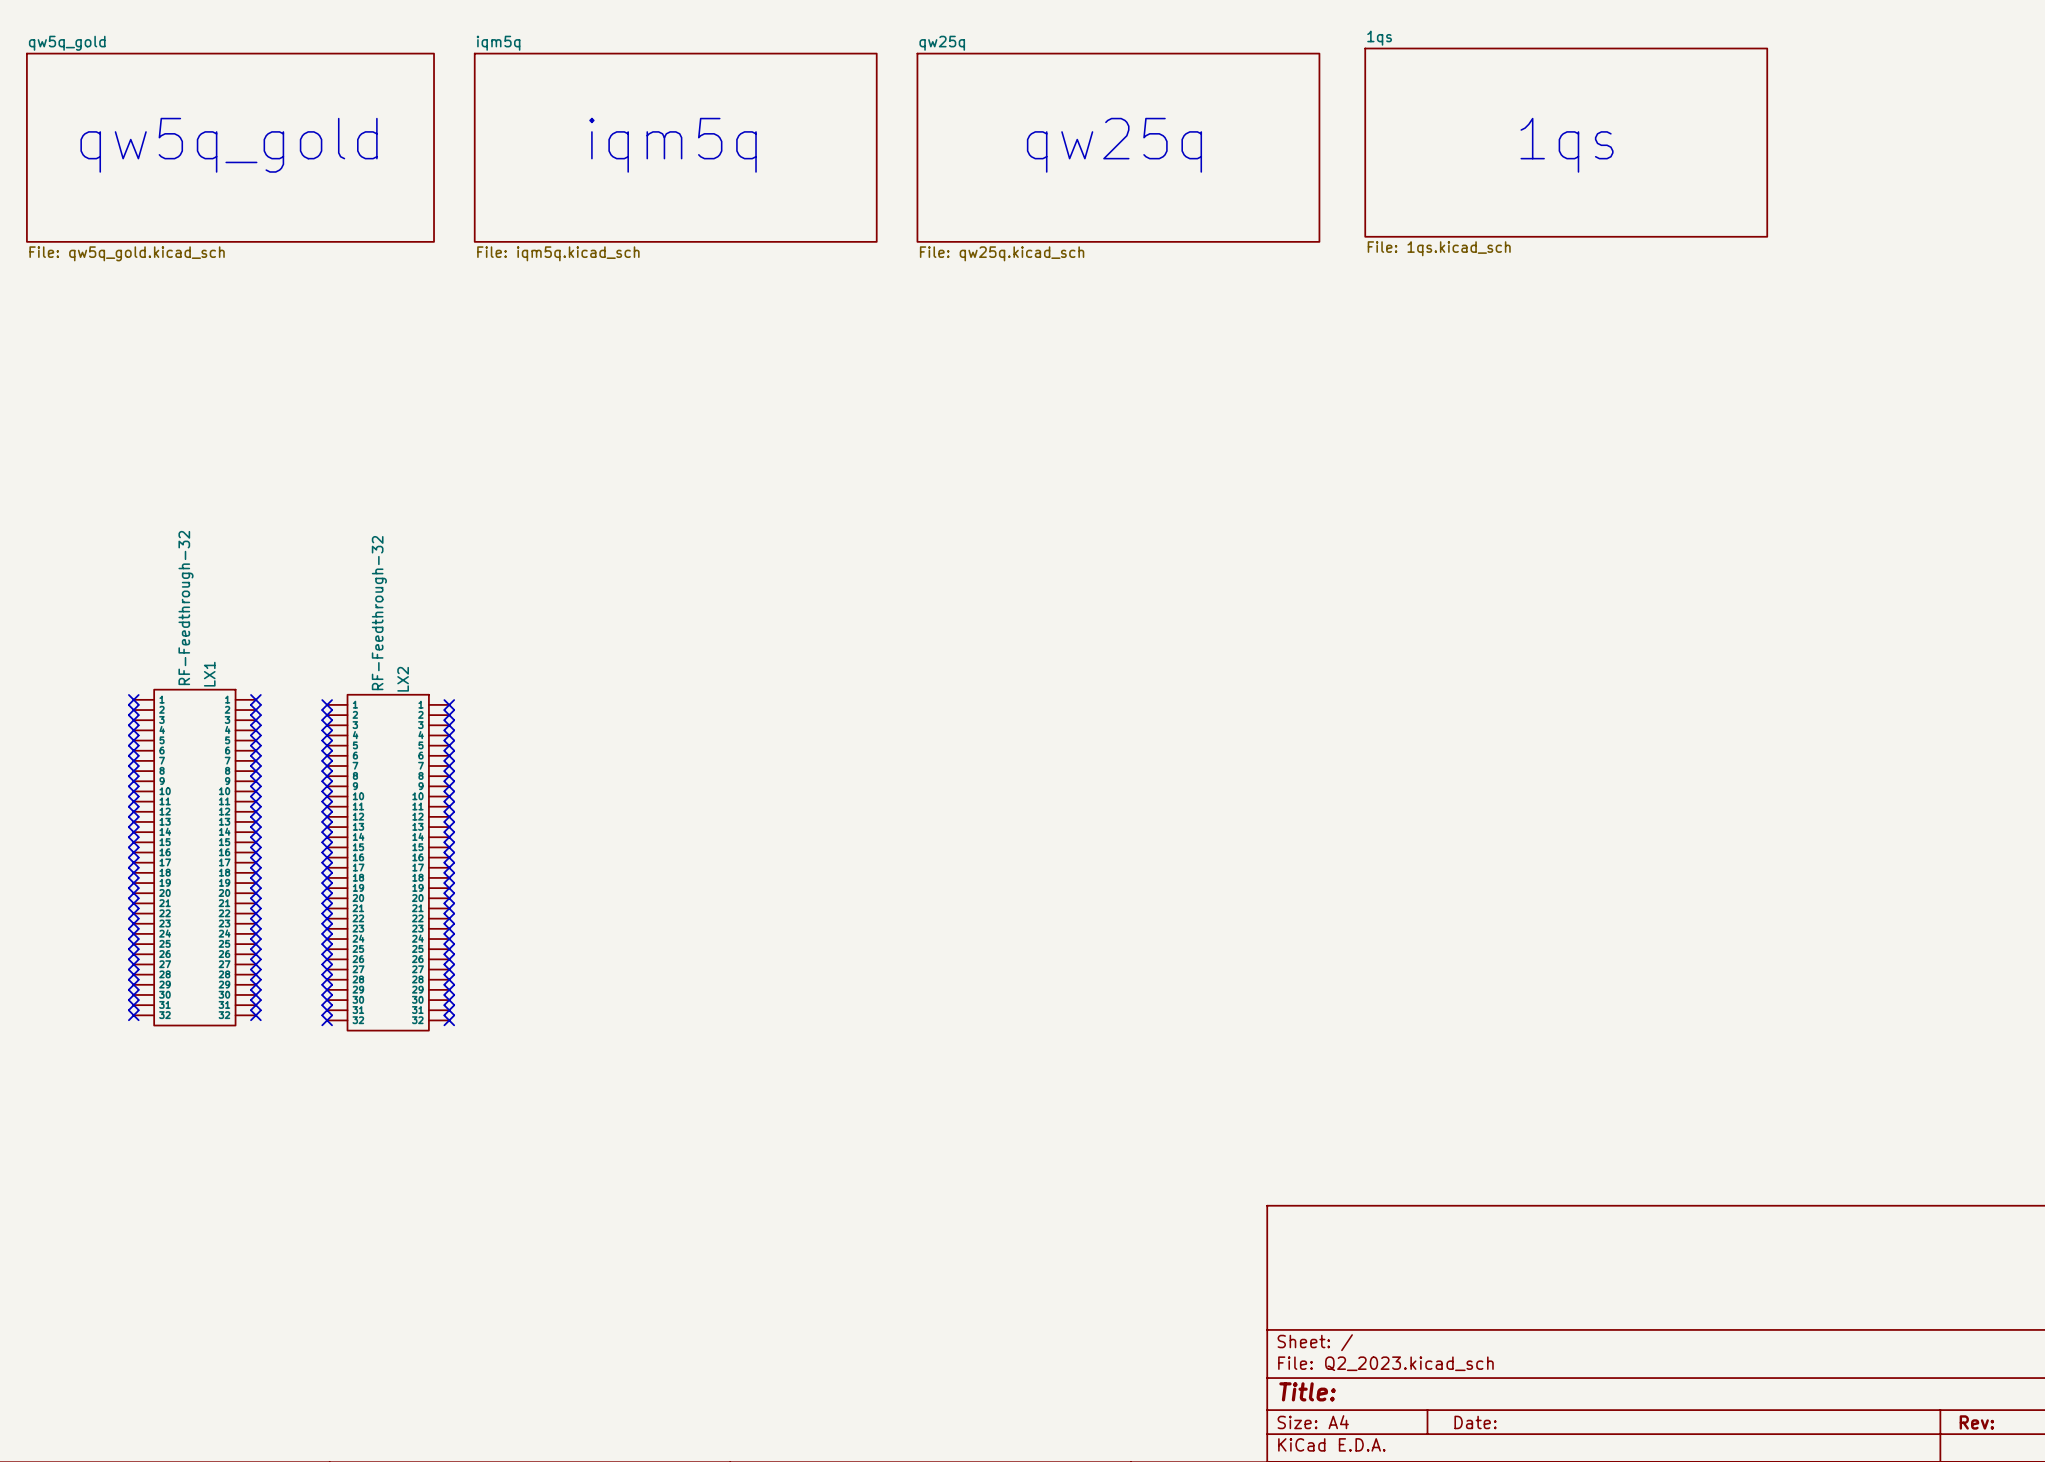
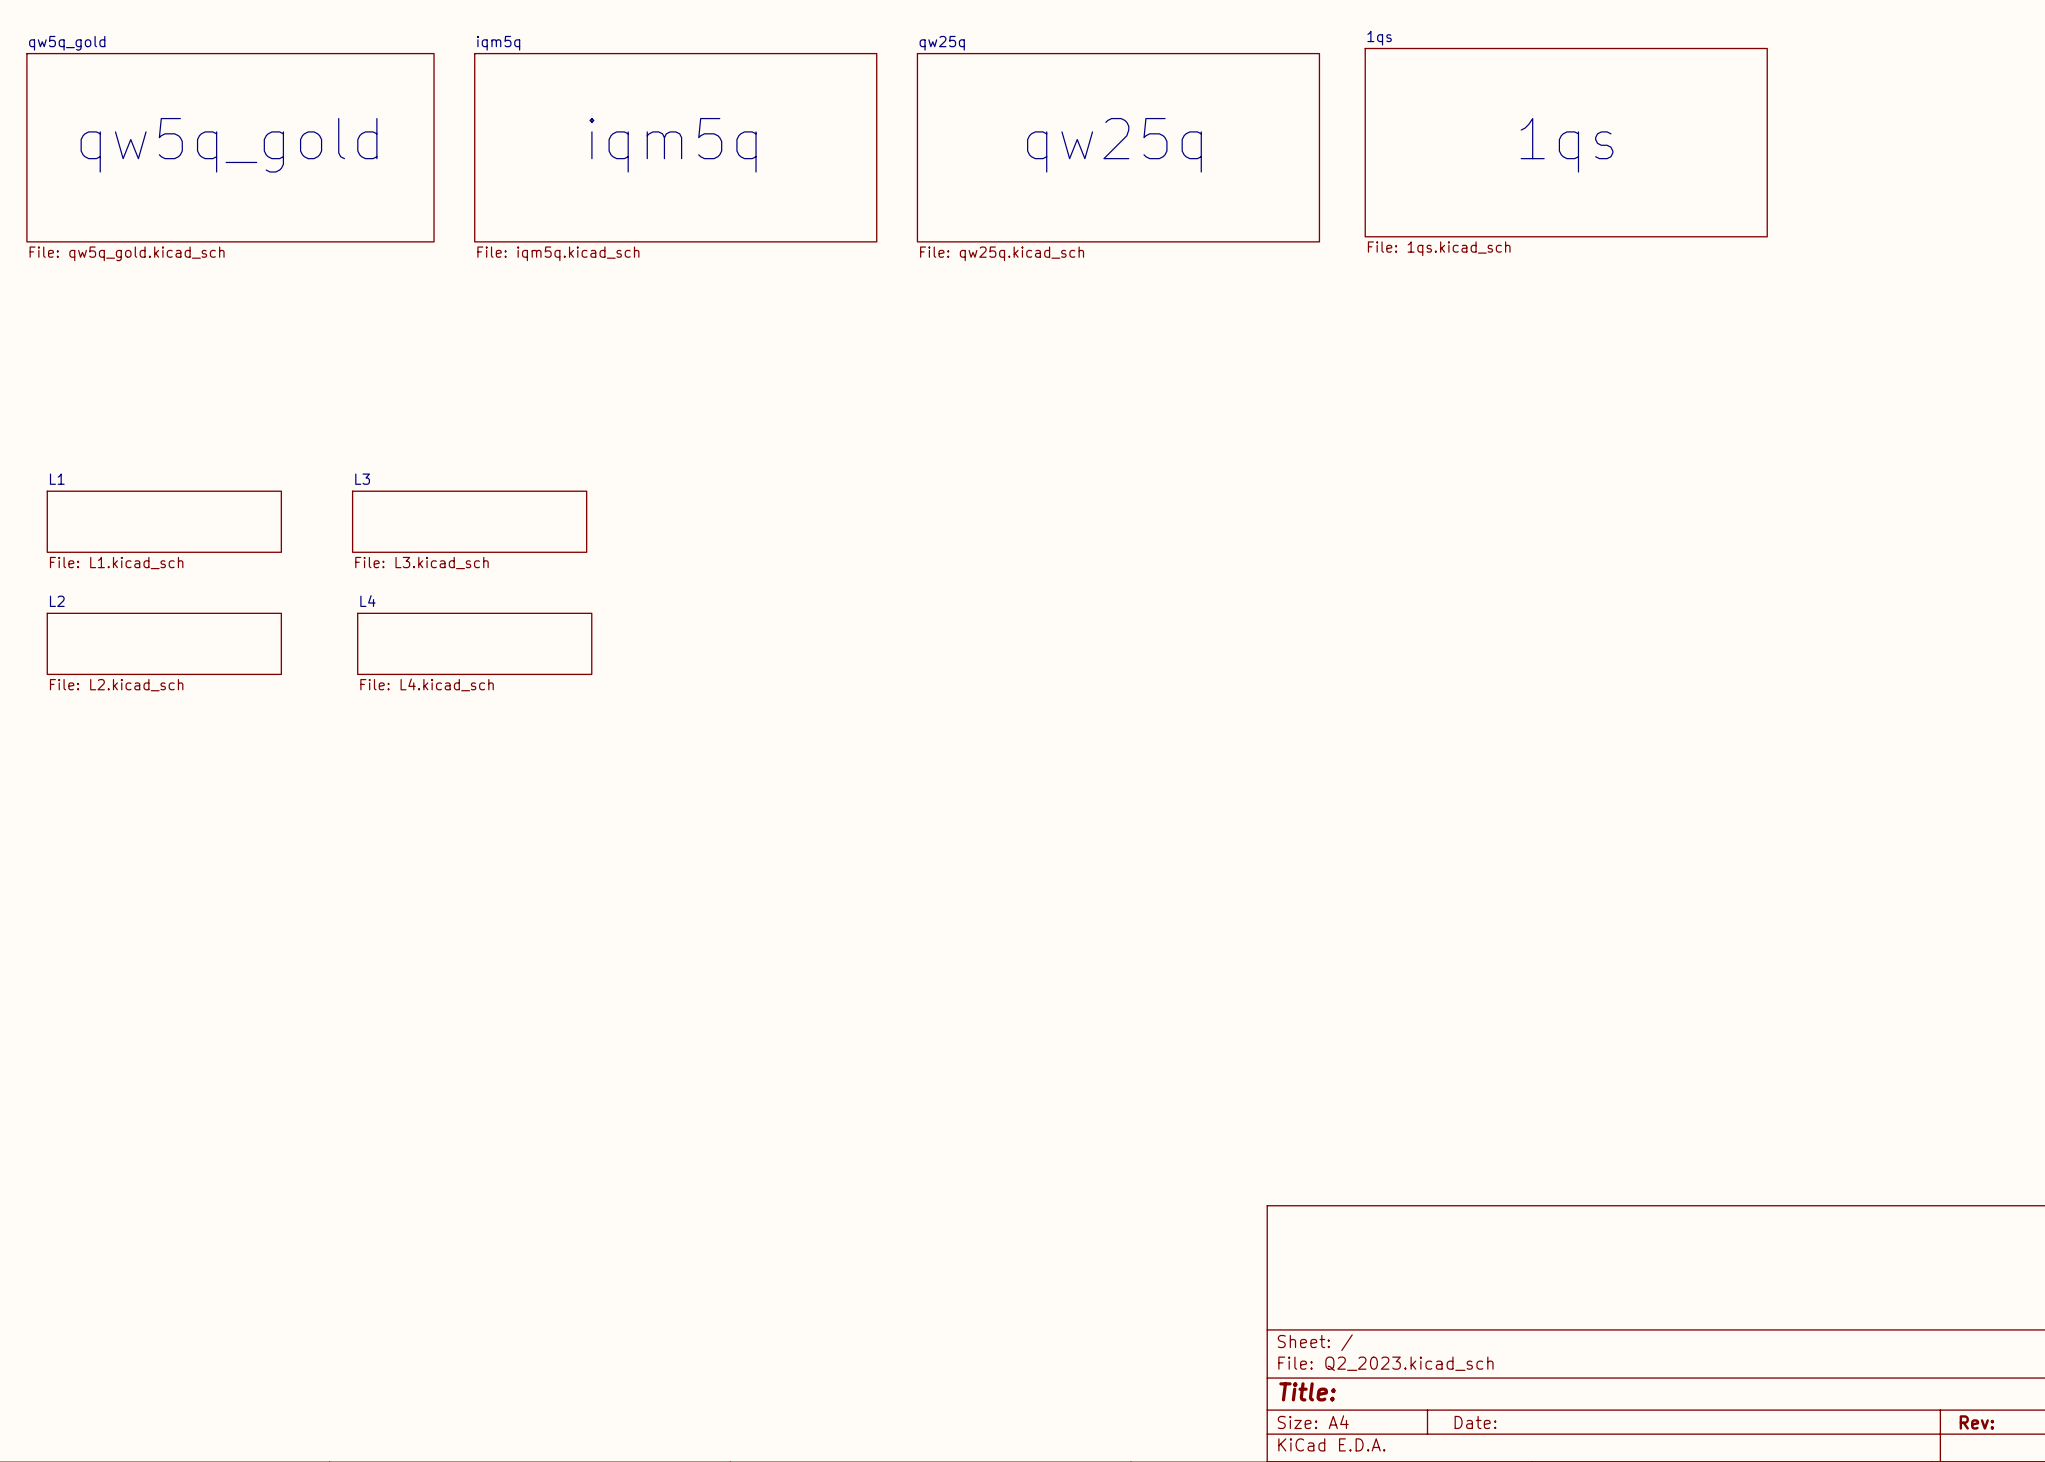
sheet L1: none -> File: L1.kicad_sch (164, 521)
sheet L3: none -> File: L3.kicad_sch (469, 521)
sheet L2: none -> File: L2.kicad_sch (164, 643)
sheet L4: none -> File: L4.kicad_sch (474, 643)
no-connect mark: (133, 699) -> none
no-connect mark: (255, 699) -> none
no-connect mark: (327, 704) -> none
no-connect mark: (449, 704) -> none
no-connect mark: (133, 710) -> none
no-connect mark: (255, 710) -> none
no-connect mark: (327, 715) -> none
no-connect mark: (449, 715) -> none
no-connect mark: (133, 720) -> none
no-connect mark: (255, 720) -> none
no-connect mark: (327, 725) -> none
no-connect mark: (449, 725) -> none
no-connect mark: (133, 730) -> none
no-connect mark: (255, 730) -> none
no-connect mark: (327, 735) -> none
no-connect mark: (449, 735) -> none
no-connect mark: (133, 740) -> none
no-connect mark: (255, 740) -> none
no-connect mark: (327, 745) -> none
no-connect mark: (449, 745) -> none
no-connect mark: (133, 750) -> none
no-connect mark: (255, 750) -> none
no-connect mark: (327, 755) -> none
no-connect mark: (449, 755) -> none
no-connect mark: (133, 760) -> none
no-connect mark: (255, 760) -> none
no-connect mark: (327, 766) -> none
no-connect mark: (449, 766) -> none
no-connect mark: (133, 771) -> none
no-connect mark: (255, 771) -> none
no-connect mark: (327, 776) -> none
no-connect mark: (449, 776) -> none
no-connect mark: (133, 781) -> none
no-connect mark: (255, 781) -> none
no-connect mark: (327, 786) -> none
no-connect mark: (449, 786) -> none
no-connect mark: (133, 791) -> none
no-connect mark: (255, 791) -> none
no-connect mark: (327, 796) -> none
no-connect mark: (449, 796) -> none
no-connect mark: (133, 801) -> none
no-connect mark: (255, 801) -> none
no-connect mark: (327, 806) -> none
no-connect mark: (449, 806) -> none
no-connect mark: (133, 811) -> none
no-connect mark: (255, 811) -> none
no-connect mark: (327, 816) -> none
no-connect mark: (449, 816) -> none
no-connect mark: (133, 821) -> none
no-connect mark: (255, 821) -> none
no-connect mark: (327, 827) -> none
no-connect mark: (449, 827) -> none
no-connect mark: (133, 832) -> none
no-connect mark: (255, 832) -> none
no-connect mark: (327, 837) -> none
no-connect mark: (449, 837) -> none
no-connect mark: (133, 842) -> none
no-connect mark: (255, 842) -> none
no-connect mark: (327, 847) -> none
no-connect mark: (449, 847) -> none
no-connect mark: (133, 852) -> none
no-connect mark: (255, 852) -> none
LX1: RF-Feedthrough-32 (194, 857) -> none
no-connect mark: (327, 857) -> none
no-connect mark: (449, 857) -> none
no-connect mark: (133, 862) -> none
no-connect mark: (255, 862) -> none
LX2: RF-Feedthrough-32 (388, 862) -> none
no-connect mark: (327, 867) -> none
no-connect mark: (449, 867) -> none
no-connect mark: (133, 872) -> none
no-connect mark: (255, 872) -> none
no-connect mark: (327, 877) -> none
no-connect mark: (449, 877) -> none
no-connect mark: (133, 883) -> none
no-connect mark: (255, 883) -> none
no-connect mark: (327, 888) -> none
no-connect mark: (449, 888) -> none
no-connect mark: (133, 893) -> none
no-connect mark: (255, 893) -> none
no-connect mark: (327, 898) -> none
no-connect mark: (449, 898) -> none
no-connect mark: (133, 903) -> none
no-connect mark: (255, 903) -> none
no-connect mark: (327, 908) -> none
no-connect mark: (449, 908) -> none
no-connect mark: (133, 913) -> none
no-connect mark: (255, 913) -> none
no-connect mark: (327, 918) -> none
no-connect mark: (449, 918) -> none
no-connect mark: (133, 923) -> none
no-connect mark: (255, 923) -> none
no-connect mark: (327, 928) -> none
no-connect mark: (449, 928) -> none
no-connect mark: (133, 933) -> none
no-connect mark: (255, 933) -> none
no-connect mark: (327, 939) -> none
no-connect mark: (449, 939) -> none
no-connect mark: (133, 944) -> none
no-connect mark: (255, 944) -> none
no-connect mark: (327, 949) -> none
no-connect mark: (449, 949) -> none
no-connect mark: (133, 954) -> none
no-connect mark: (255, 954) -> none
no-connect mark: (327, 959) -> none
no-connect mark: (449, 959) -> none
no-connect mark: (133, 964) -> none
no-connect mark: (255, 964) -> none
no-connect mark: (327, 969) -> none
no-connect mark: (449, 969) -> none
no-connect mark: (133, 974) -> none
no-connect mark: (255, 974) -> none
no-connect mark: (327, 979) -> none
no-connect mark: (449, 979) -> none
no-connect mark: (133, 984) -> none
no-connect mark: (255, 984) -> none
no-connect mark: (327, 989) -> none
no-connect mark: (449, 989) -> none
no-connect mark: (133, 994) -> none
no-connect mark: (255, 994) -> none
no-connect mark: (327, 1000) -> none
no-connect mark: (449, 1000) -> none
no-connect mark: (133, 1005) -> none
no-connect mark: (255, 1005) -> none
no-connect mark: (327, 1010) -> none
no-connect mark: (449, 1010) -> none
no-connect mark: (133, 1015) -> none
no-connect mark: (255, 1015) -> none
no-connect mark: (327, 1020) -> none
no-connect mark: (449, 1020) -> none

